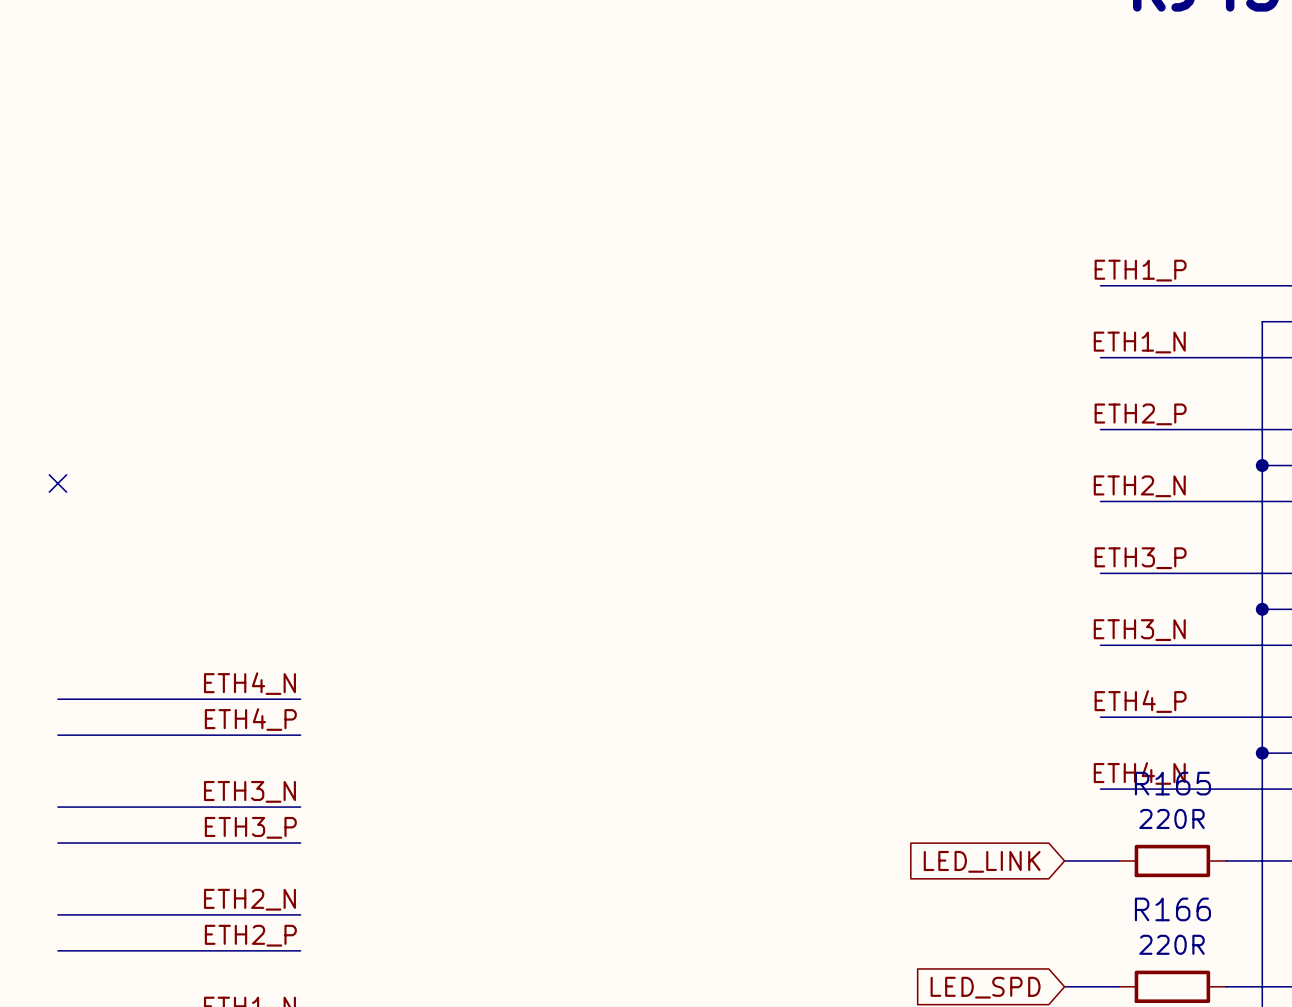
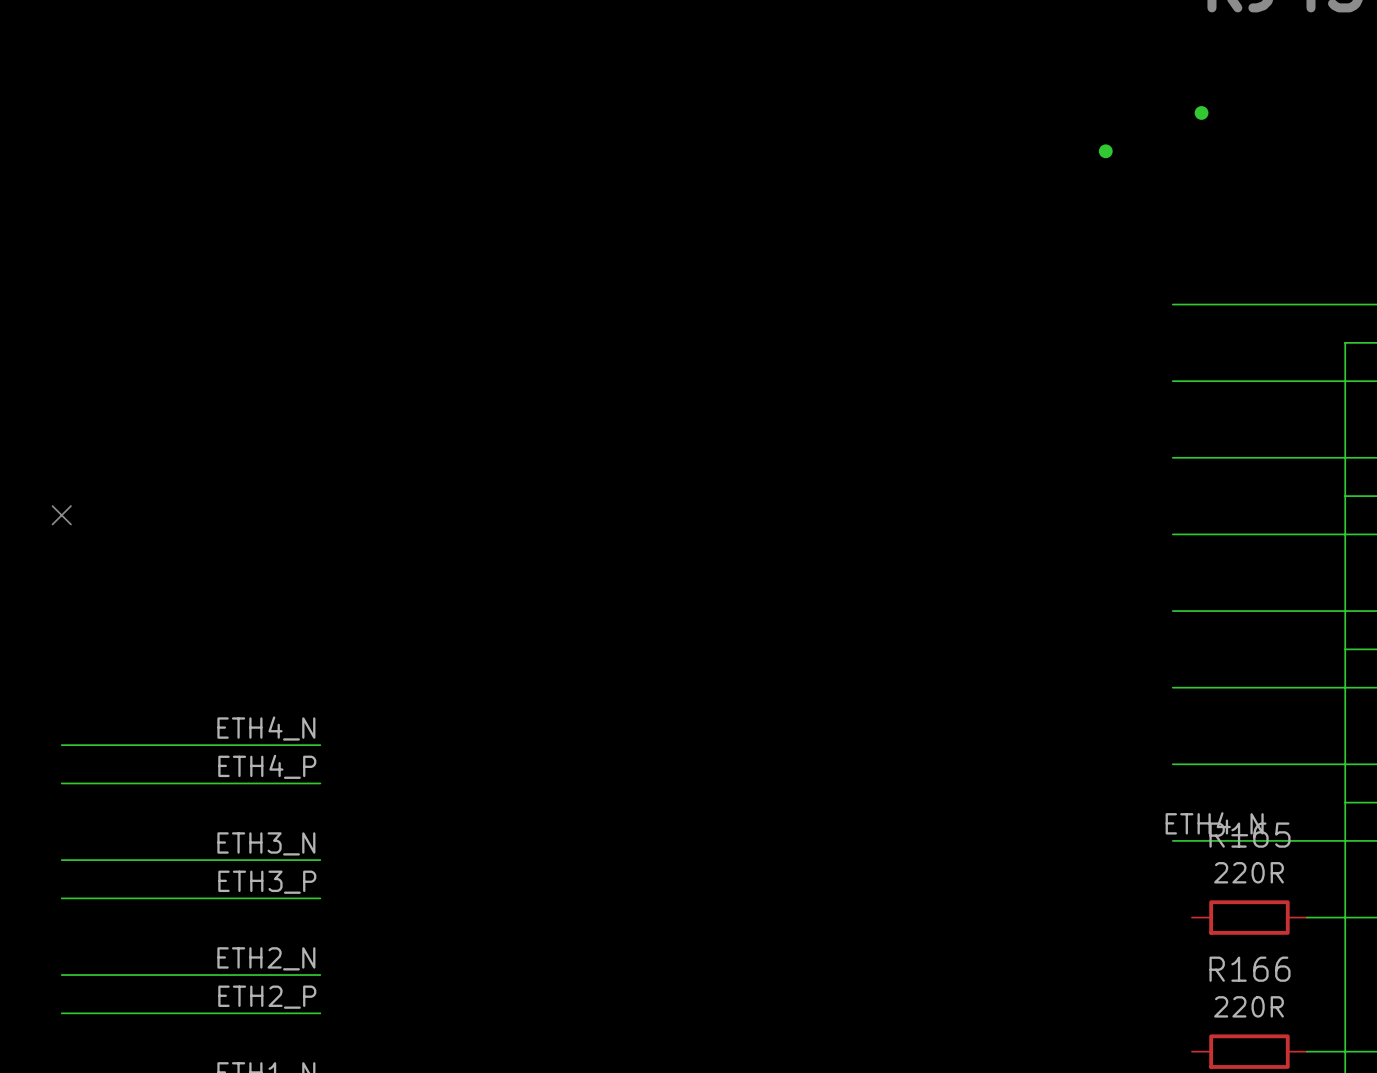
junction: none -> (1201, 112)
junction: none -> (1105, 151)
label: ETH1_P (1140, 270) -> none
label: ETH1_N (1139, 342) -> none
label: ETH2_P (1140, 414) -> none
junction: (1262, 465) -> none
label: ETH2_N (1139, 486) -> none
label: ETH3_P (1140, 558) -> none
junction: (1262, 609) -> none
label: ETH3_N (1139, 630) -> none
label: ETH4_P (1140, 701) -> none
junction: (1262, 753) -> none
wire: (1064, 860) (1118, 860) -> none
global label: LED_LINK (982, 861) -> none
wire: (1064, 986) (1118, 986) -> none
global label: LED_SPD (985, 987) -> none

